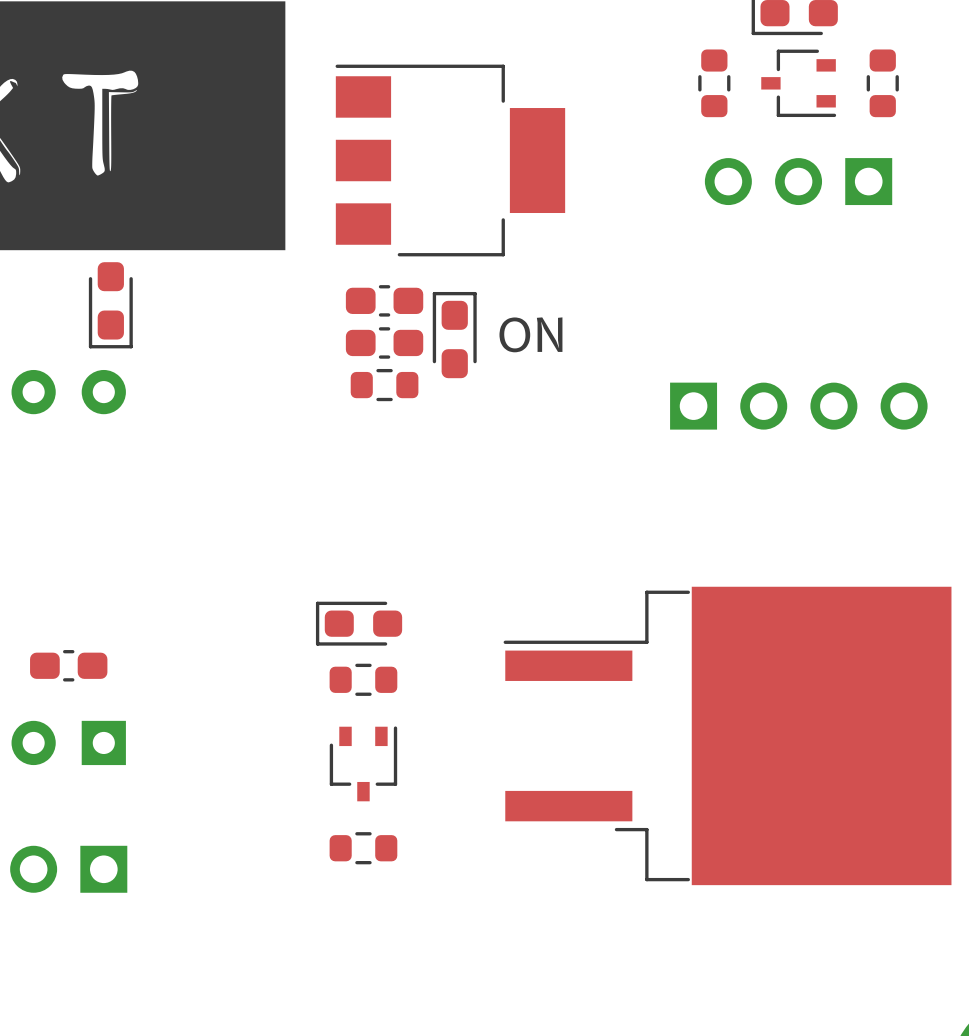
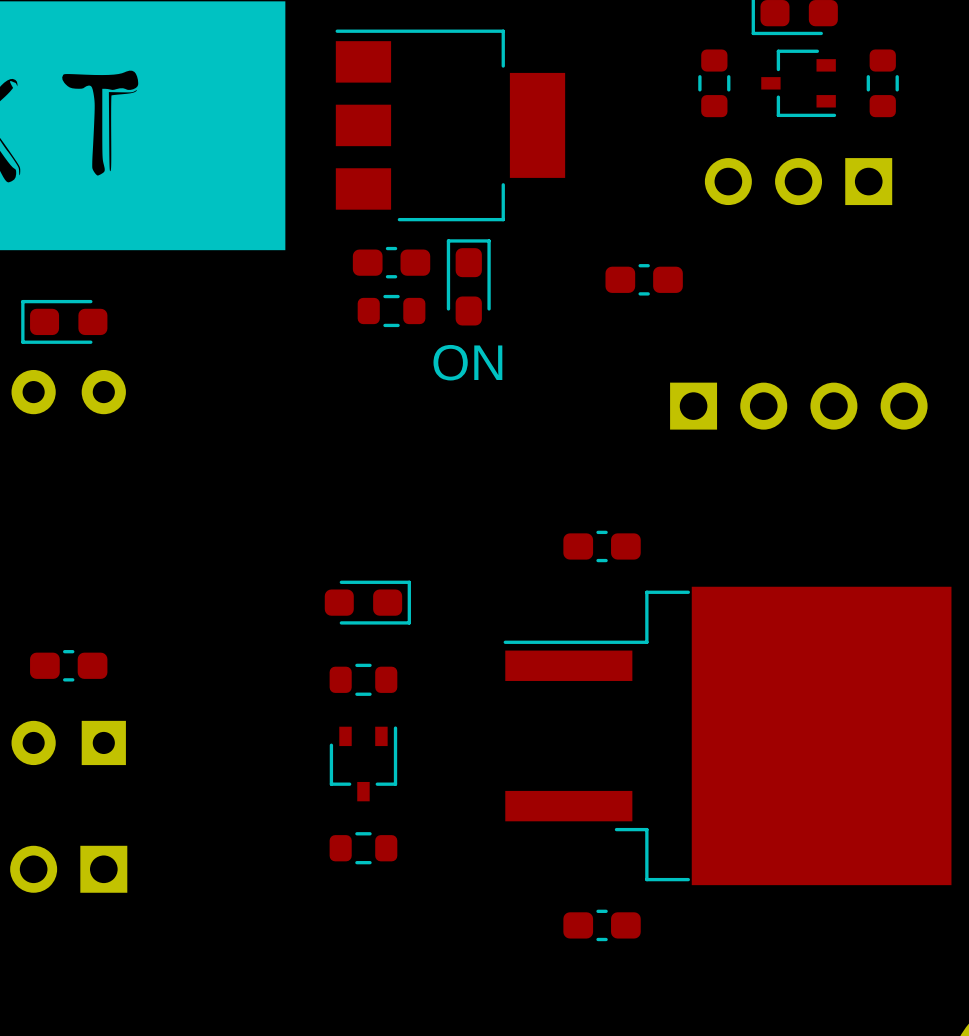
part position: (450, 160) -> (450, 125)
part: none -> (644, 279)
part footprint: [345, 285, 424, 317] -> [357, 294, 426, 328]
part rotation: 0° (110, 305) -> 90° clockwise (64, 321)
text position: ON (530, 334) -> ON (467, 362)
part position: (454, 335) -> (468, 282)
part position: (384, 342) -> (391, 262)
part: (384, 385) -> none
part: none -> (602, 546)
part rotation: 0° (359, 623) -> 180° (367, 602)
part: none -> (602, 925)

